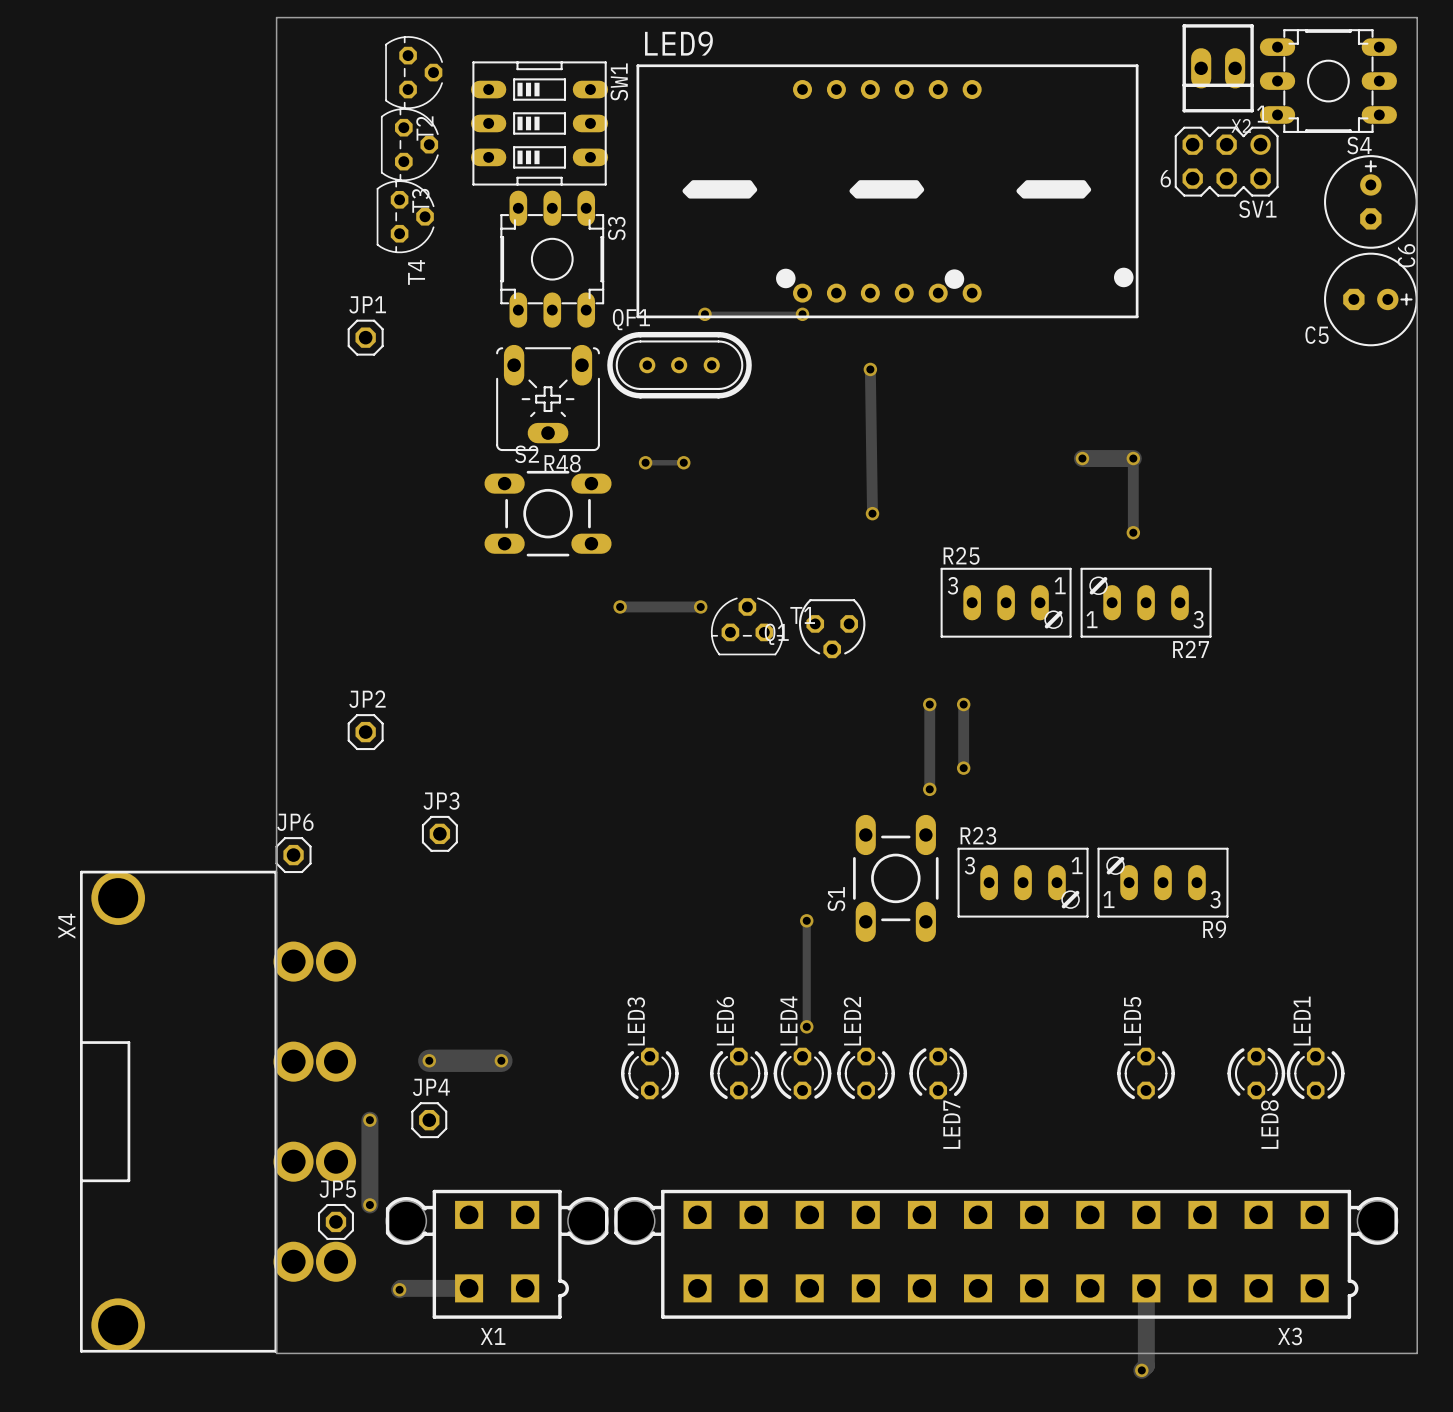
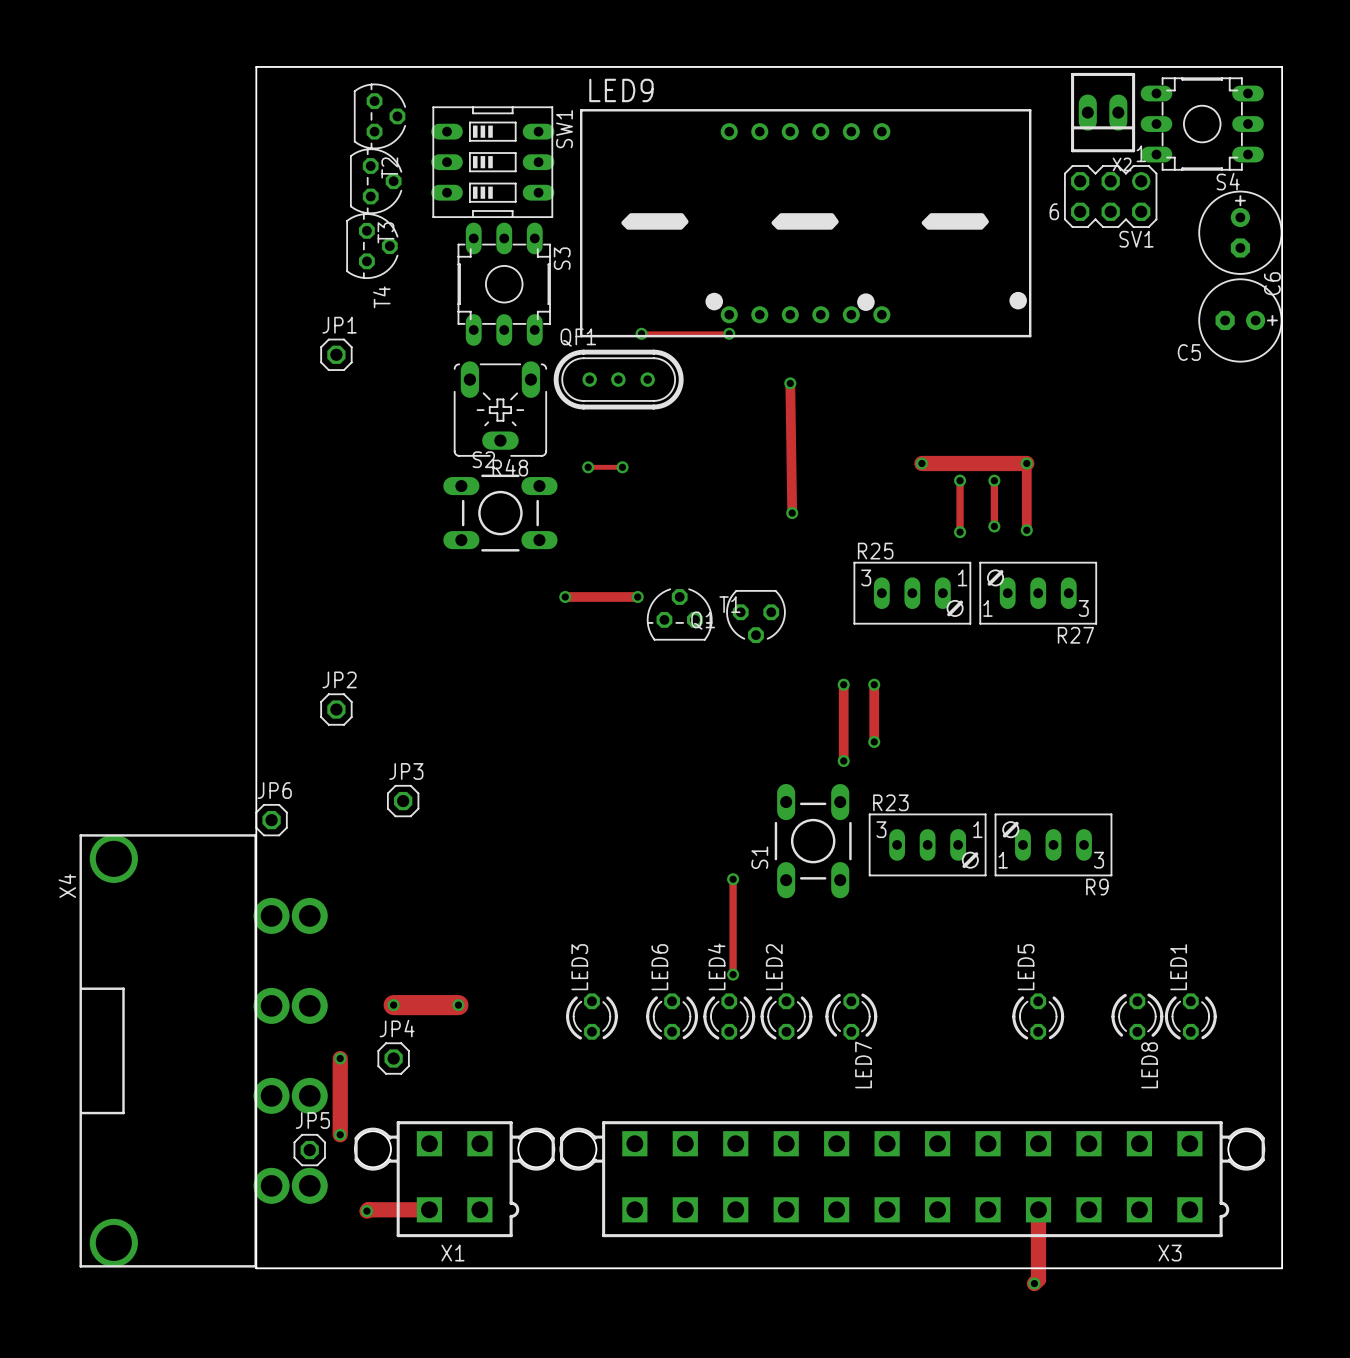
track: none -> (921, 463) (981, 463)
via: none -> (921, 463)
via: (1082, 458) -> none
track: none -> (960, 480) (960, 532)
via: none -> (960, 480)
track: none -> (994, 480) (994, 526)
via: none -> (994, 480)
via: none -> (994, 526)
via: none -> (960, 532)

